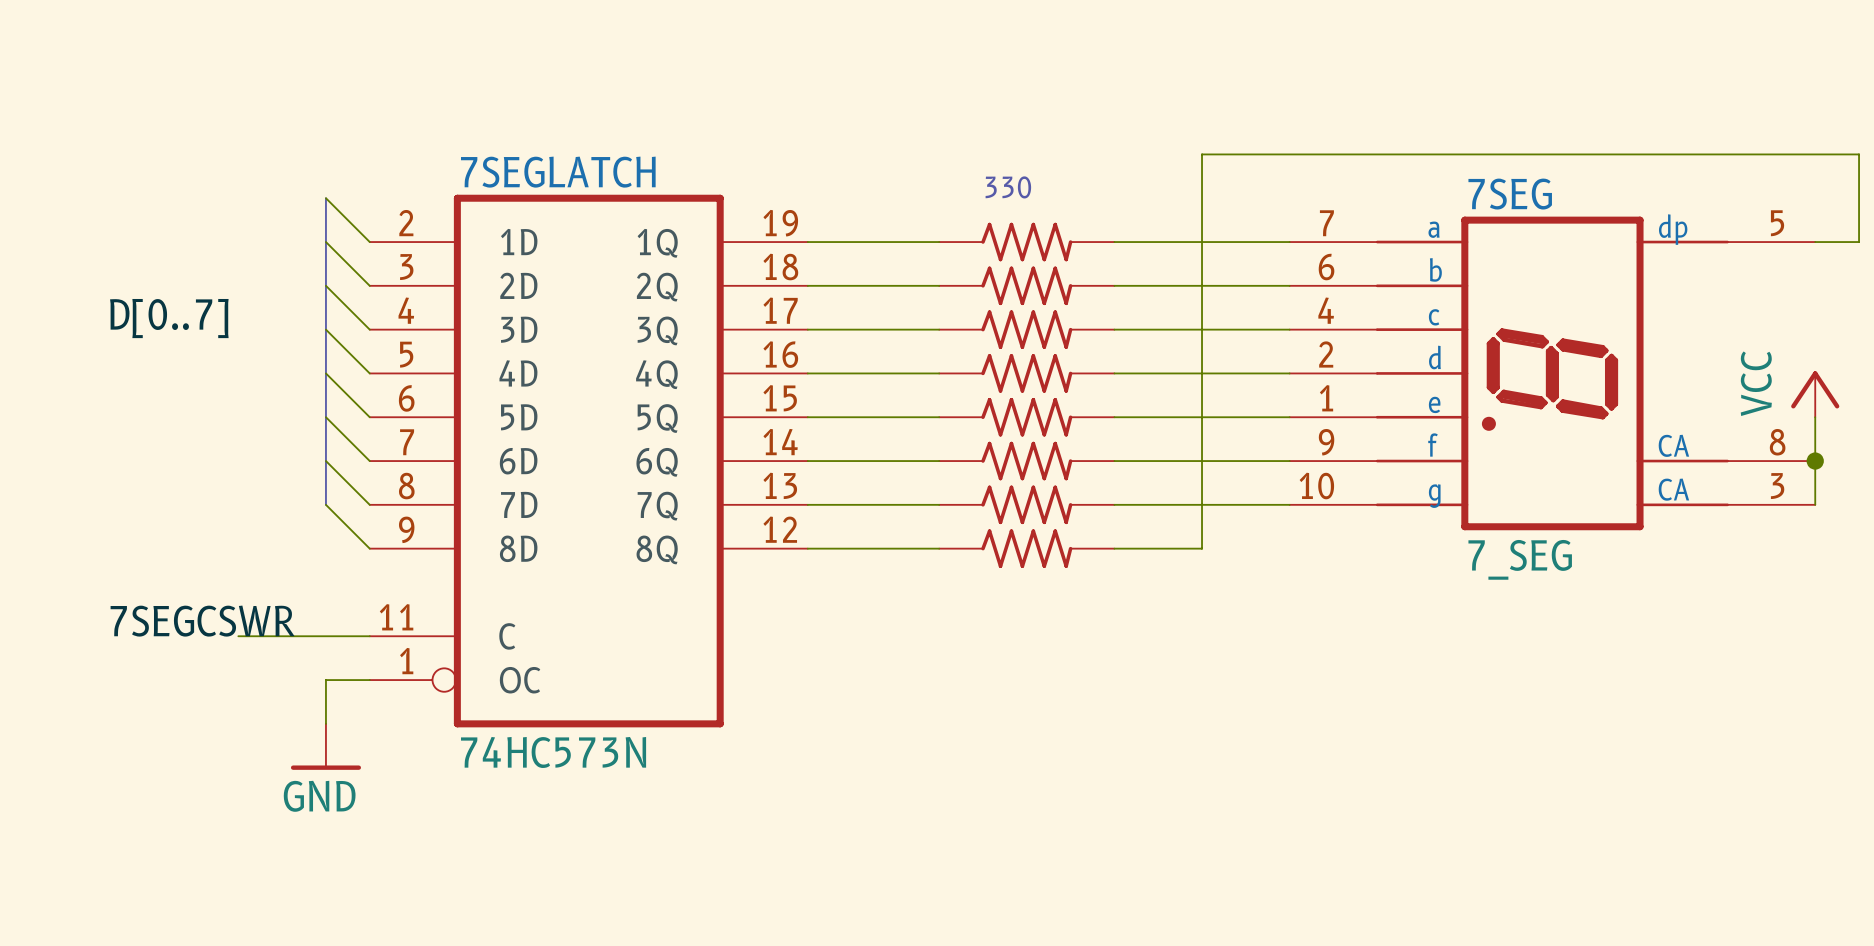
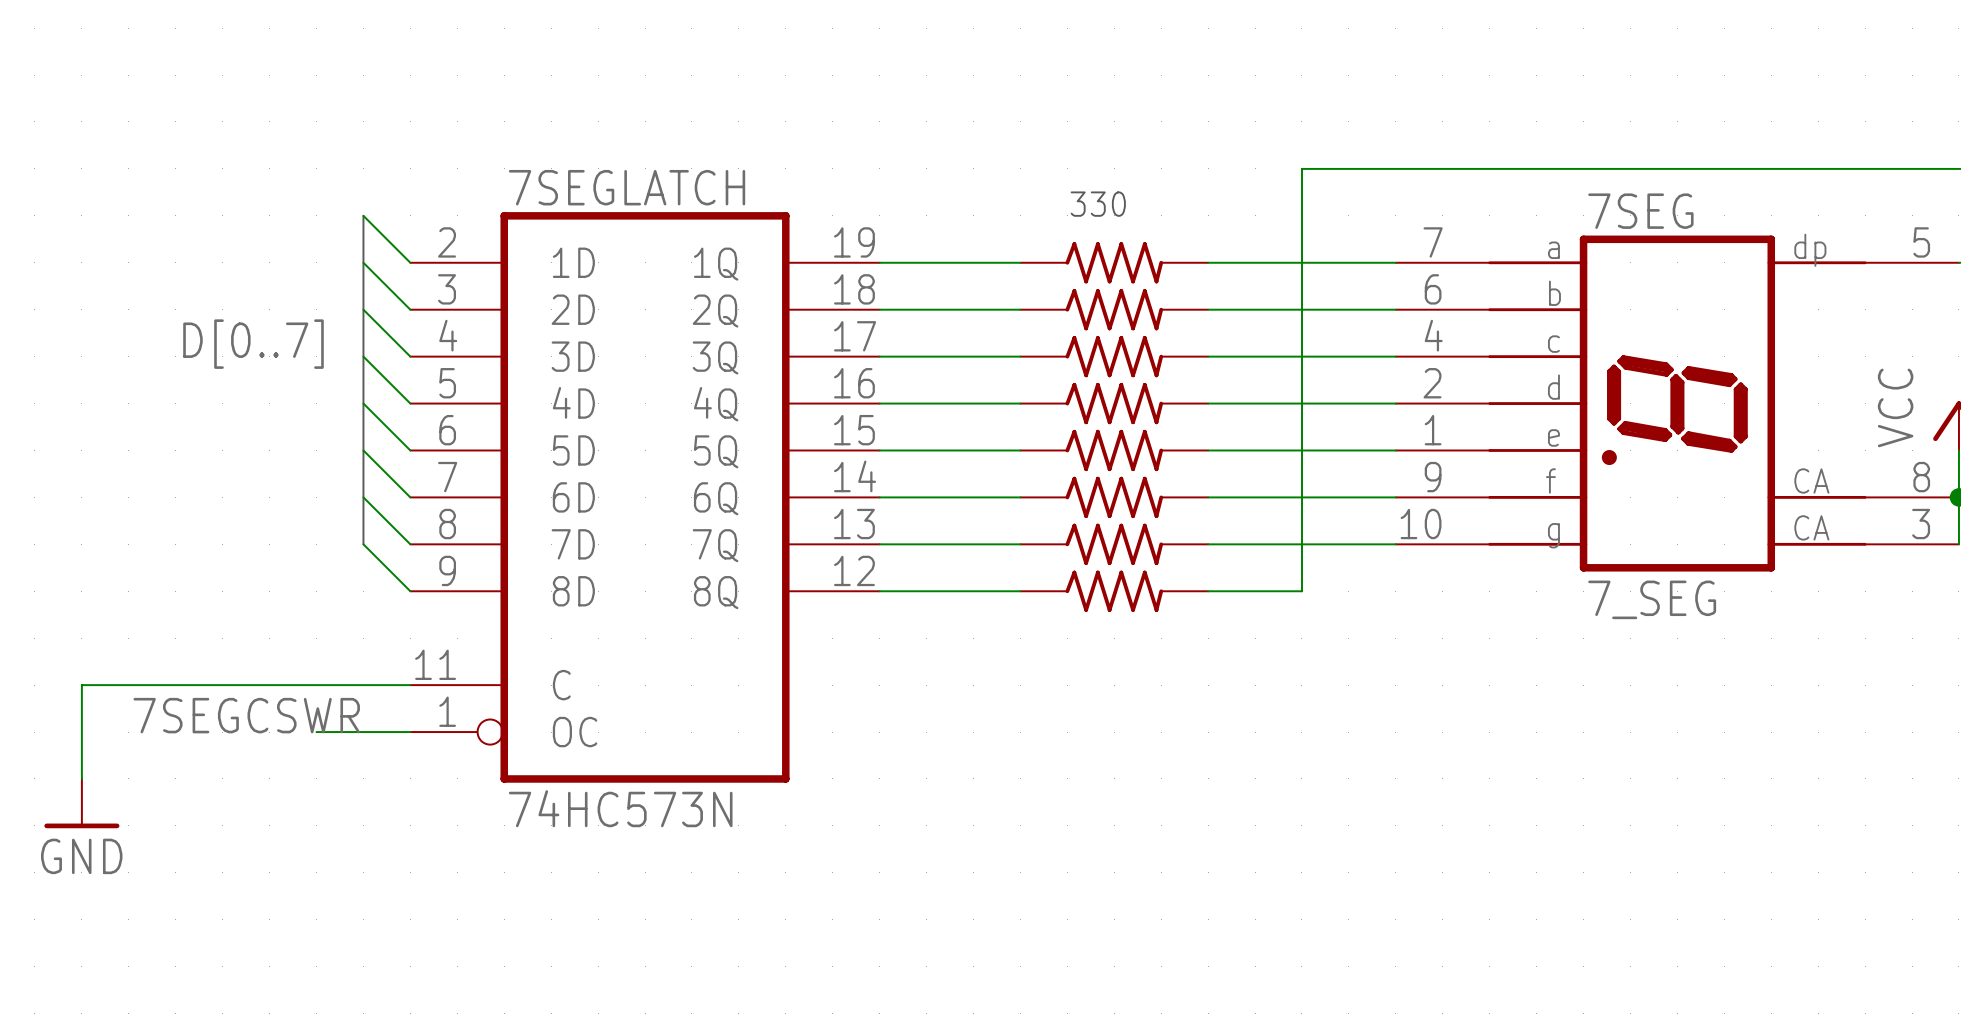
label position: D[0..7] (169, 318) -> D[0..7] (253, 344)
label position: 7SEGCSWR (202, 621) -> 7SEGCSWR (246, 715)
wire: none -> (269, 685) (81, 685) (81, 778)
wire: (325, 680) (325, 723) -> (363, 732) (316, 732)
power symbol position: GND (325, 746) -> GND (81, 803)

